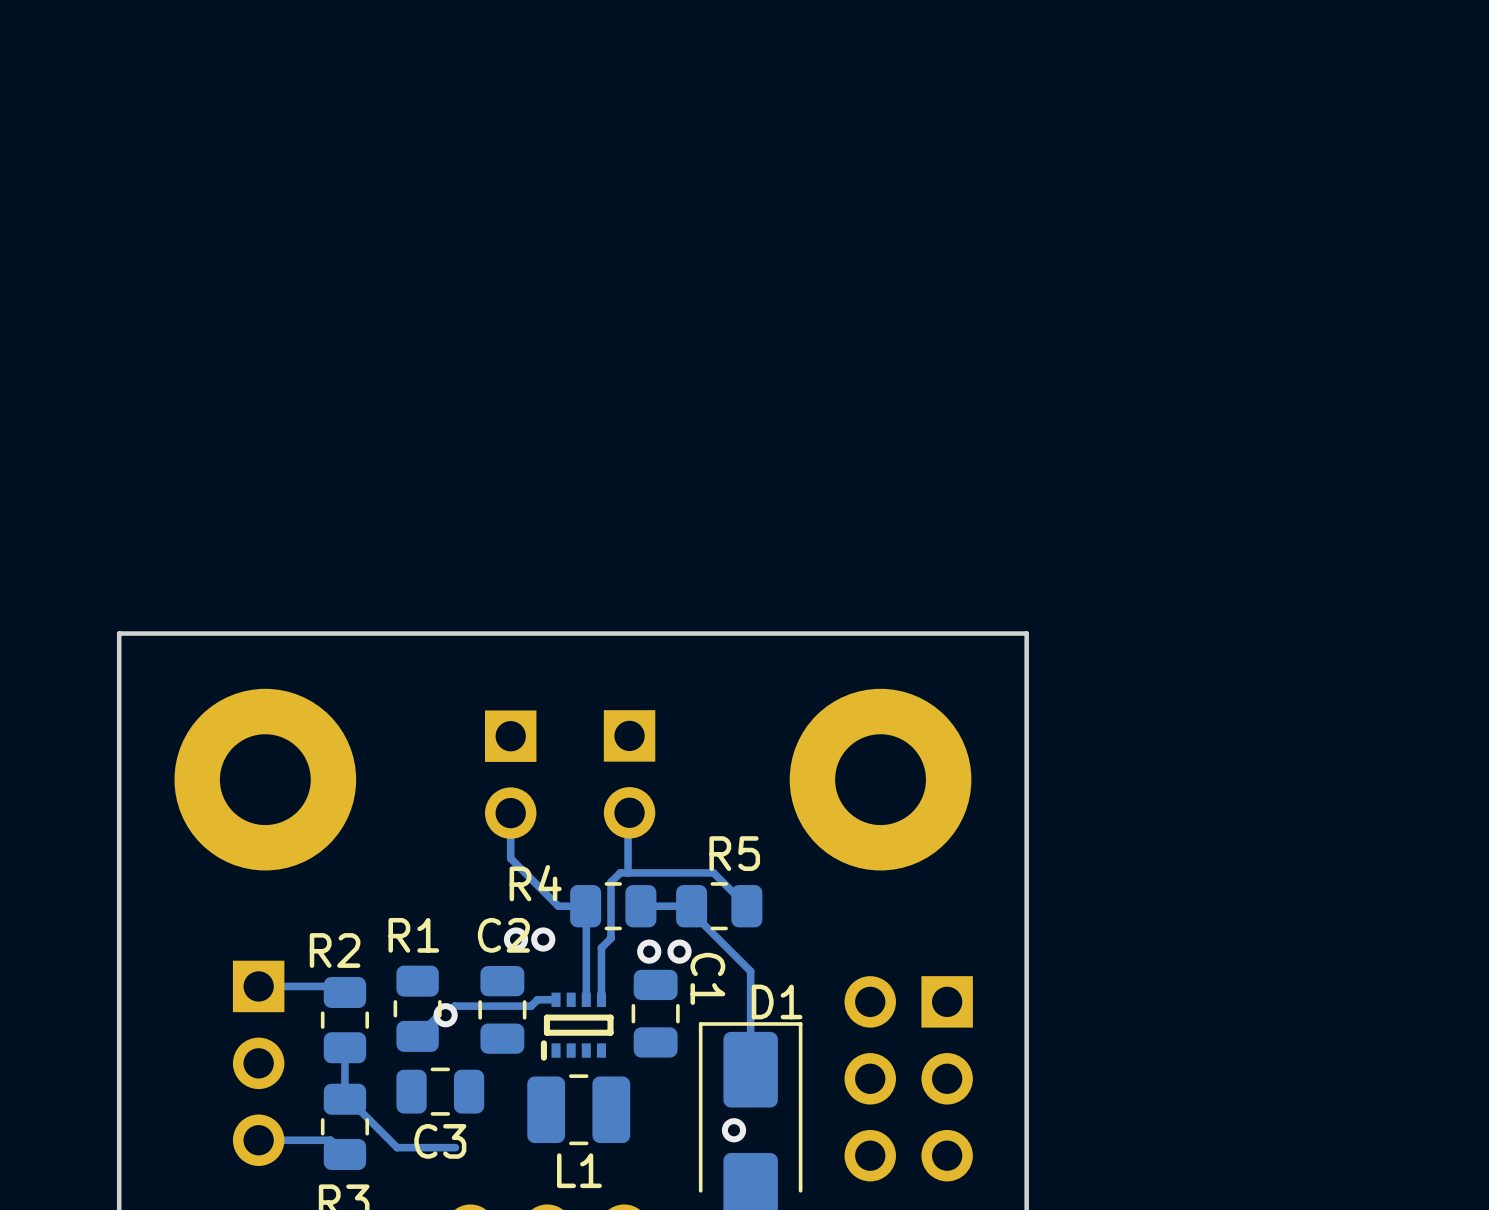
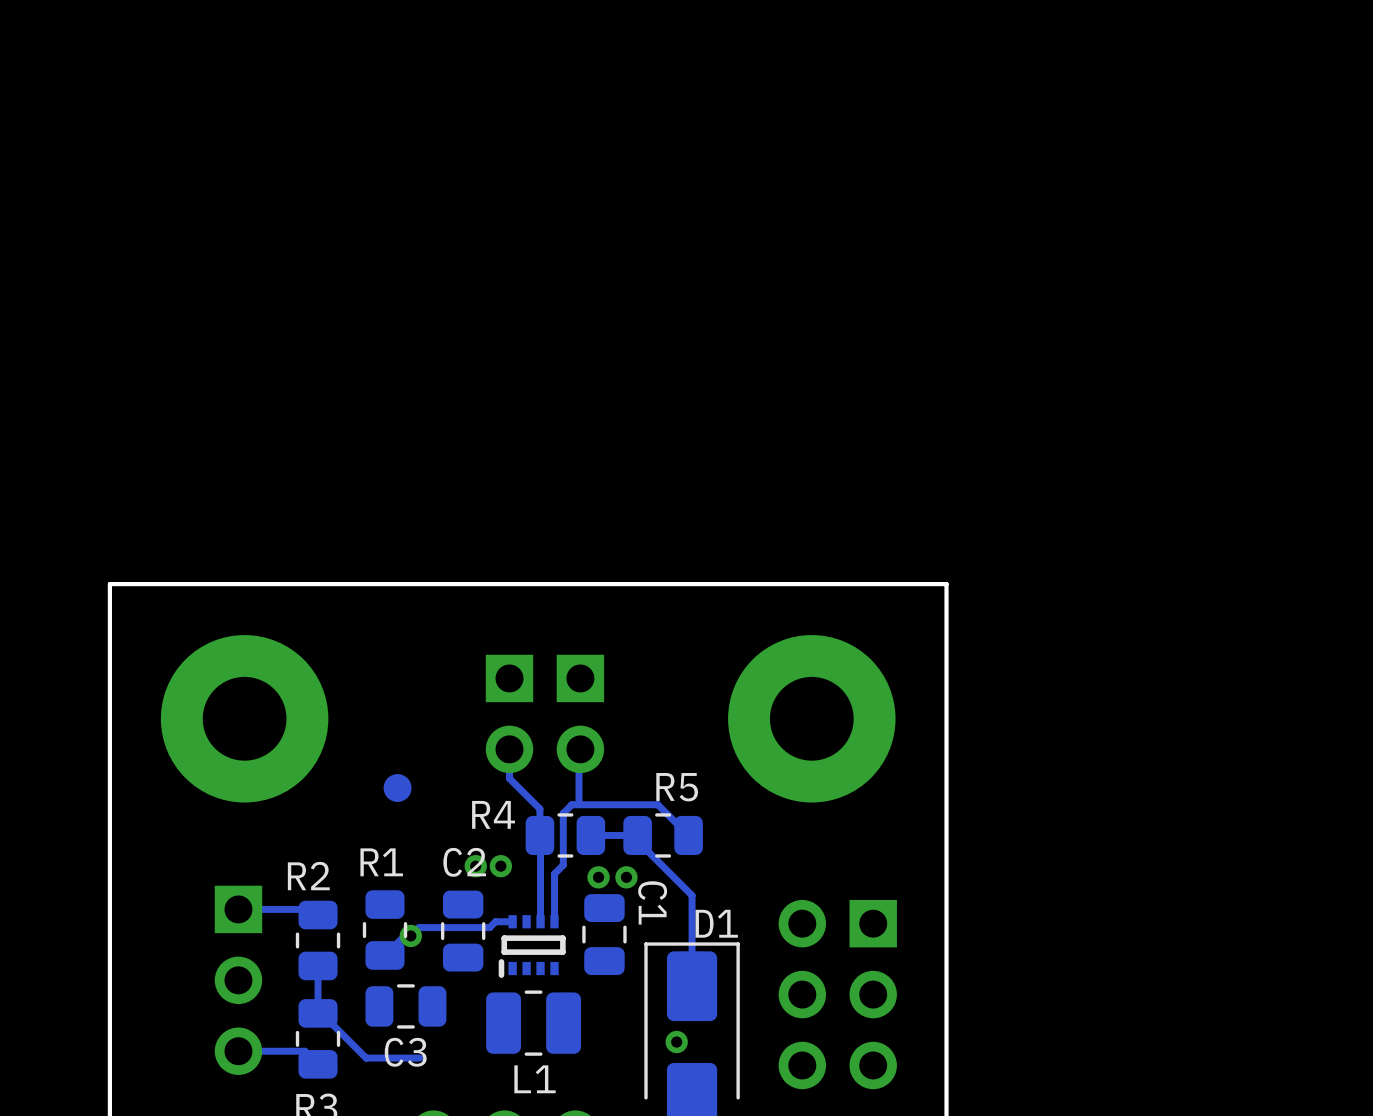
part position: (510, 774) -> (509, 713)
track: (510, 813) (510, 858) (558, 906) (585, 906) -> (509, 749) (509, 778) (539, 808) (539, 835)
part: none -> (397, 788)

